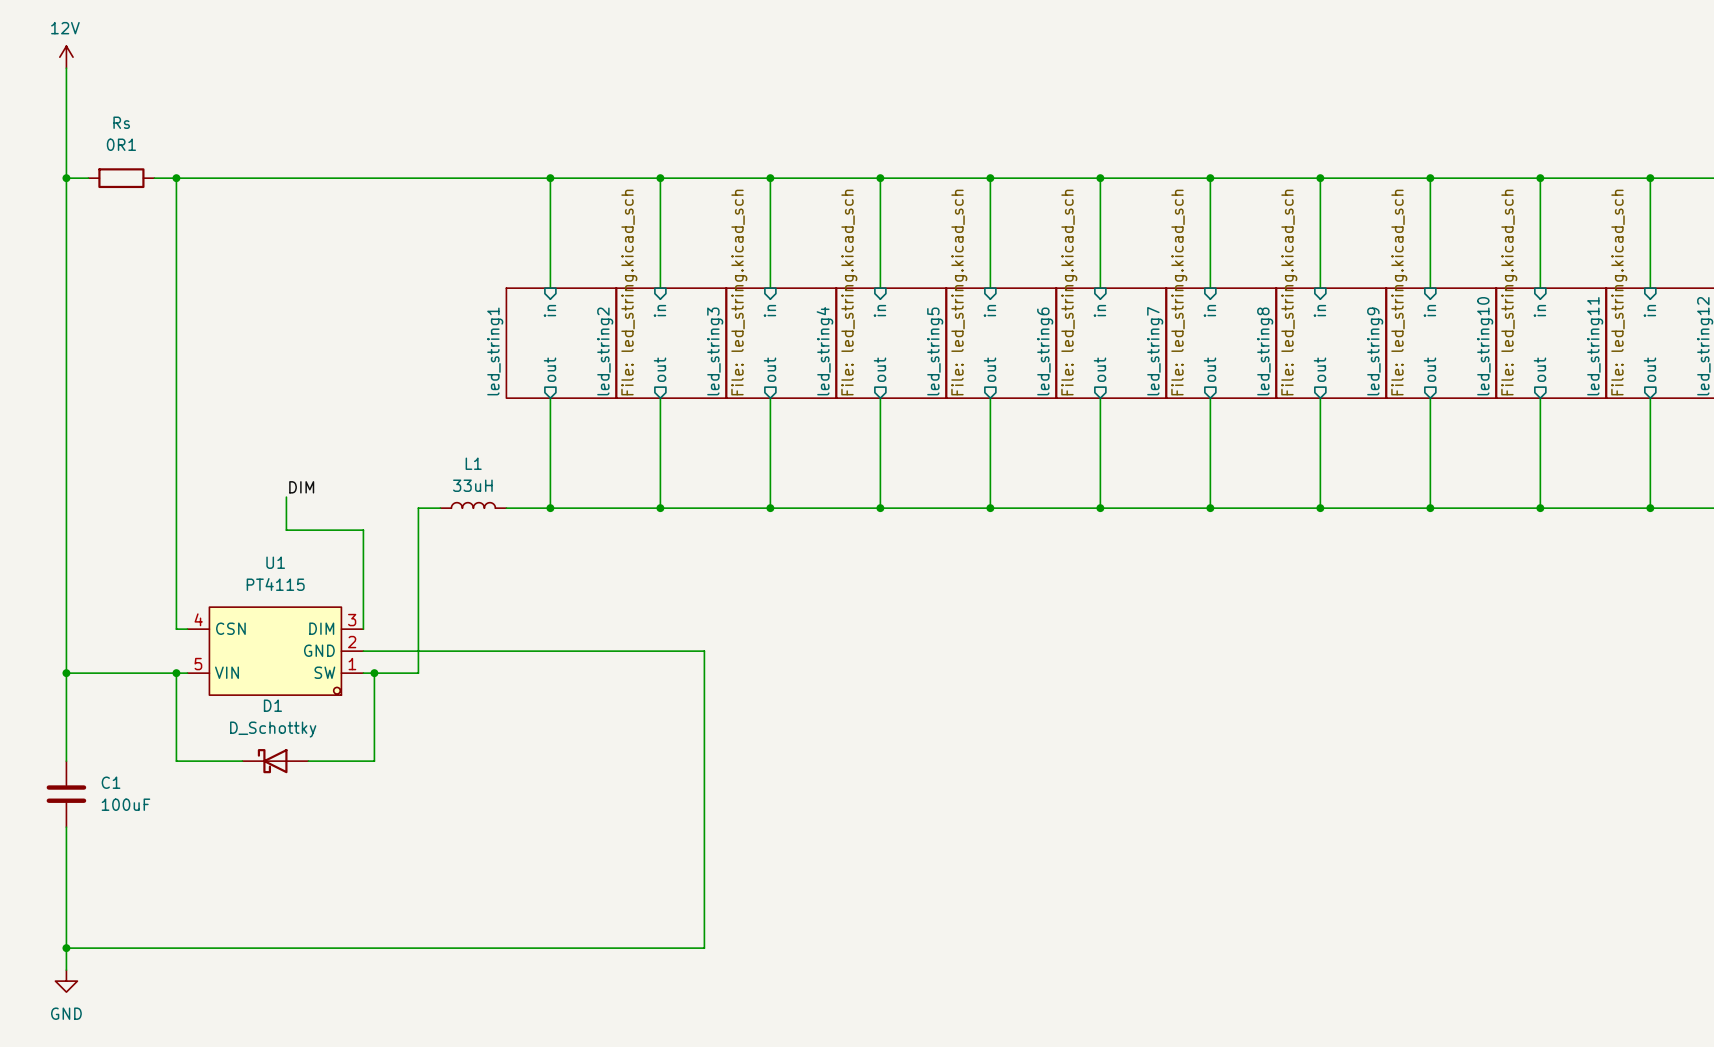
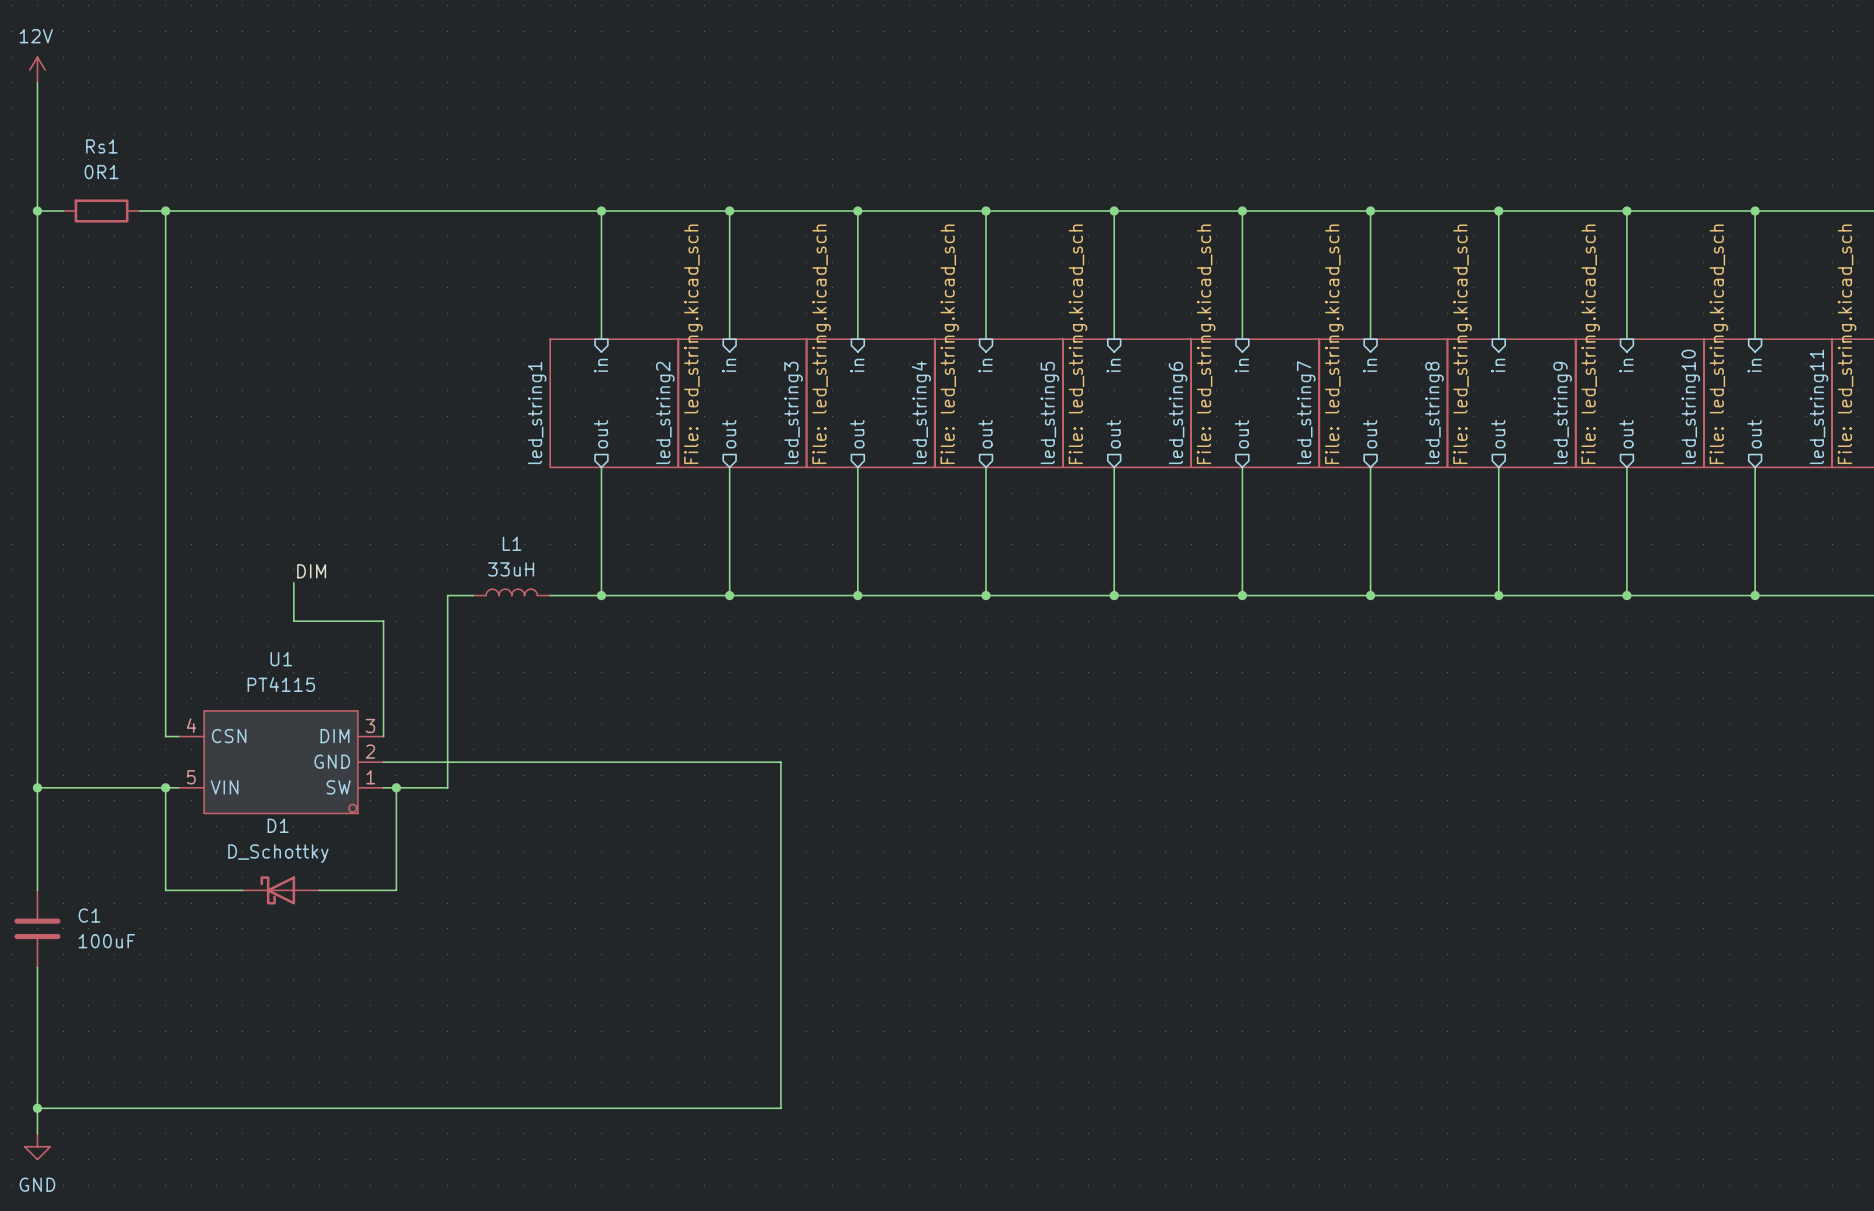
Rs name: Rs (121, 122) -> Rs1 (101, 146)

